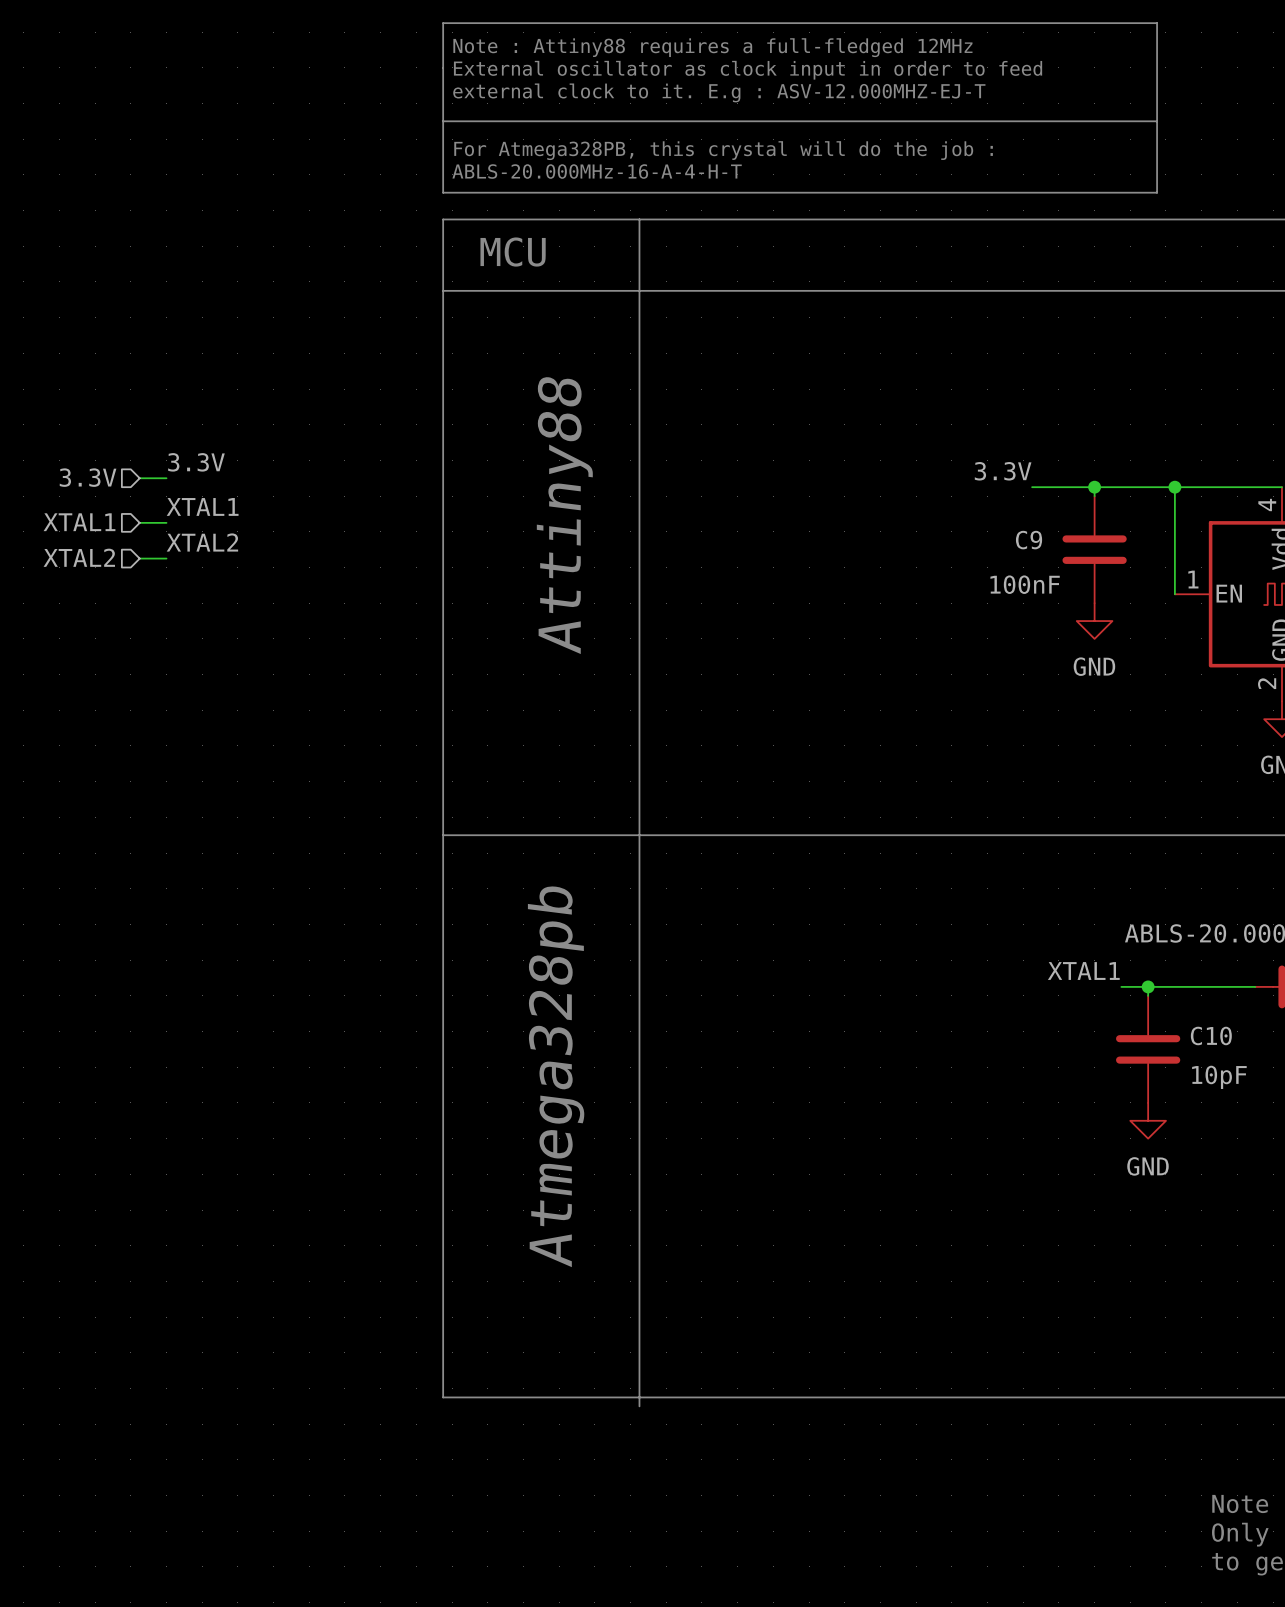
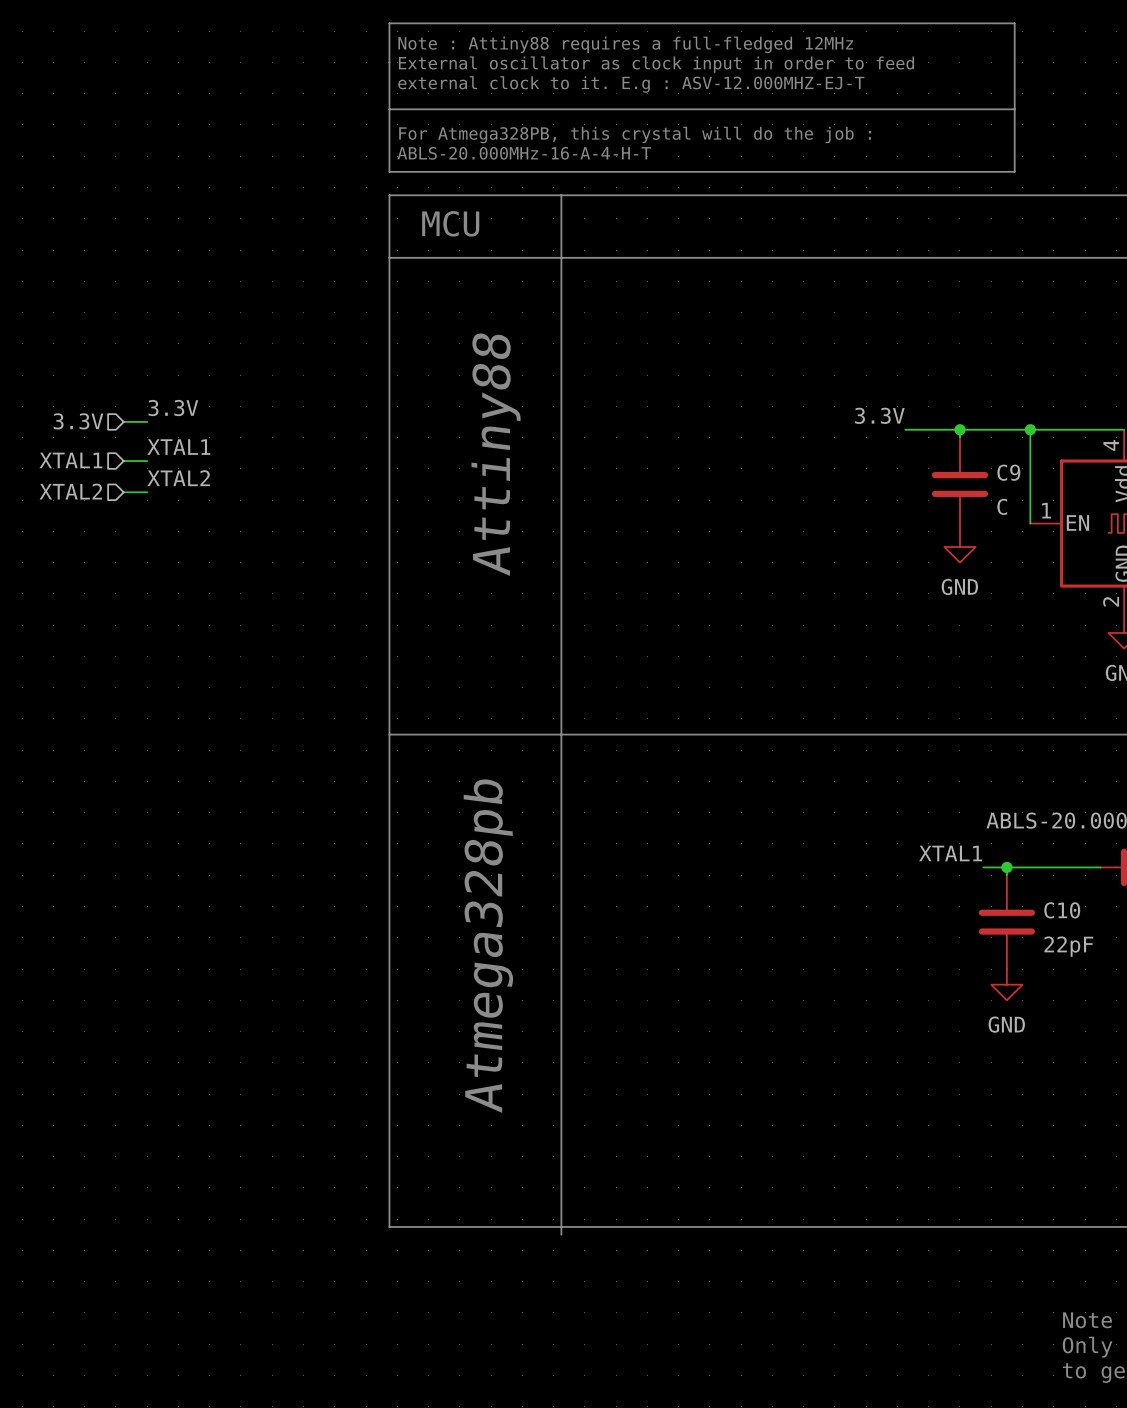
C9 name position: C9 (1029, 540) -> C9 (1008, 472)
C9 value: 100nF (1025, 584) -> C (1002, 506)
C10 value: 10pF (1219, 1077) -> 22pF (1068, 946)

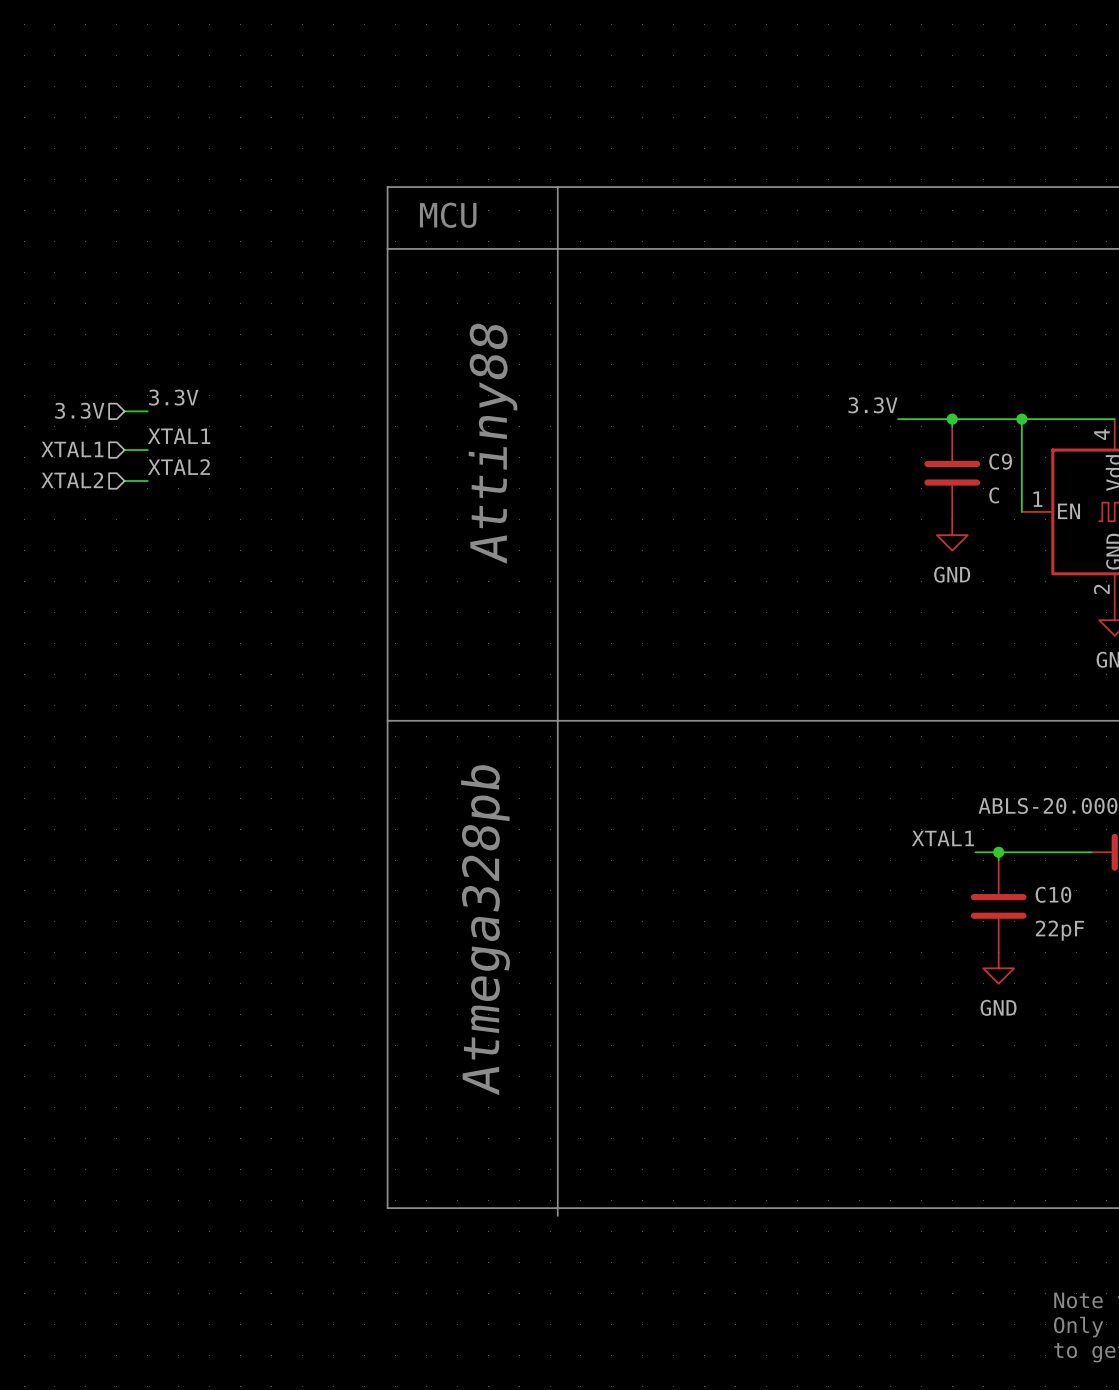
line: (389, 23) (389, 171) (1014, 171) (1014, 23) (389, 23) -> none
text: Note : Attiny88 requires a full-fledged 12MHz (625, 44) -> none
text: External oscillator as clock input in order to feed (656, 64) -> none
text: external clock to it. E.g : ASV-12.000MHZ-EJ-T (631, 84) -> none
line: (389, 109) (1014, 109) -> none
text: For Atmega328PB, this crystal will do the job : (635, 134) -> none
text: ABLS-20.000MHz-16-A-4-H-T (524, 153) -> none

